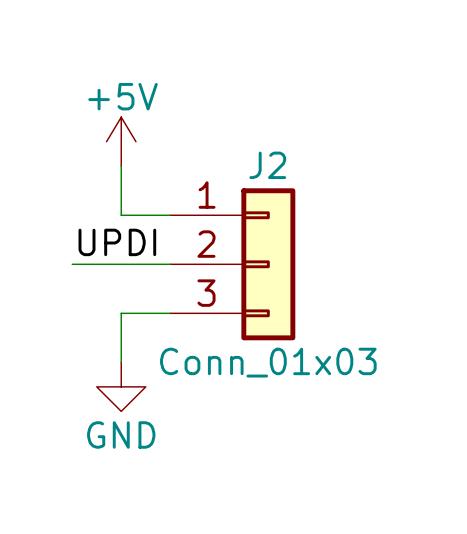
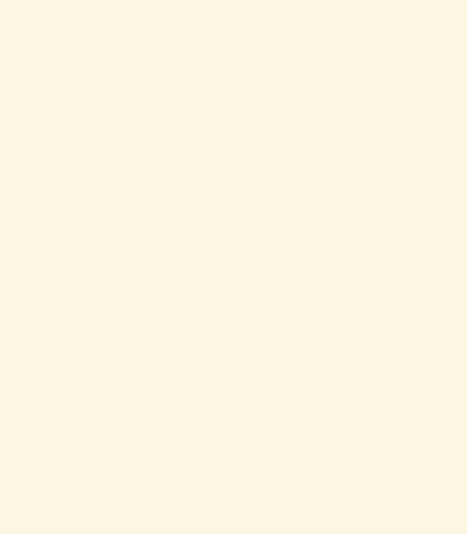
power symbol: +5V (121, 141) -> none
wire: (121, 166) (121, 215) (170, 215) -> none
label: UPDI (117, 242) -> none
wire: (72, 264) (170, 264) -> none
J2: Conn_01x03 (232, 264) -> none
wire: (170, 313) (121, 313) (121, 362) -> none
power symbol: GND (121, 386) -> none

